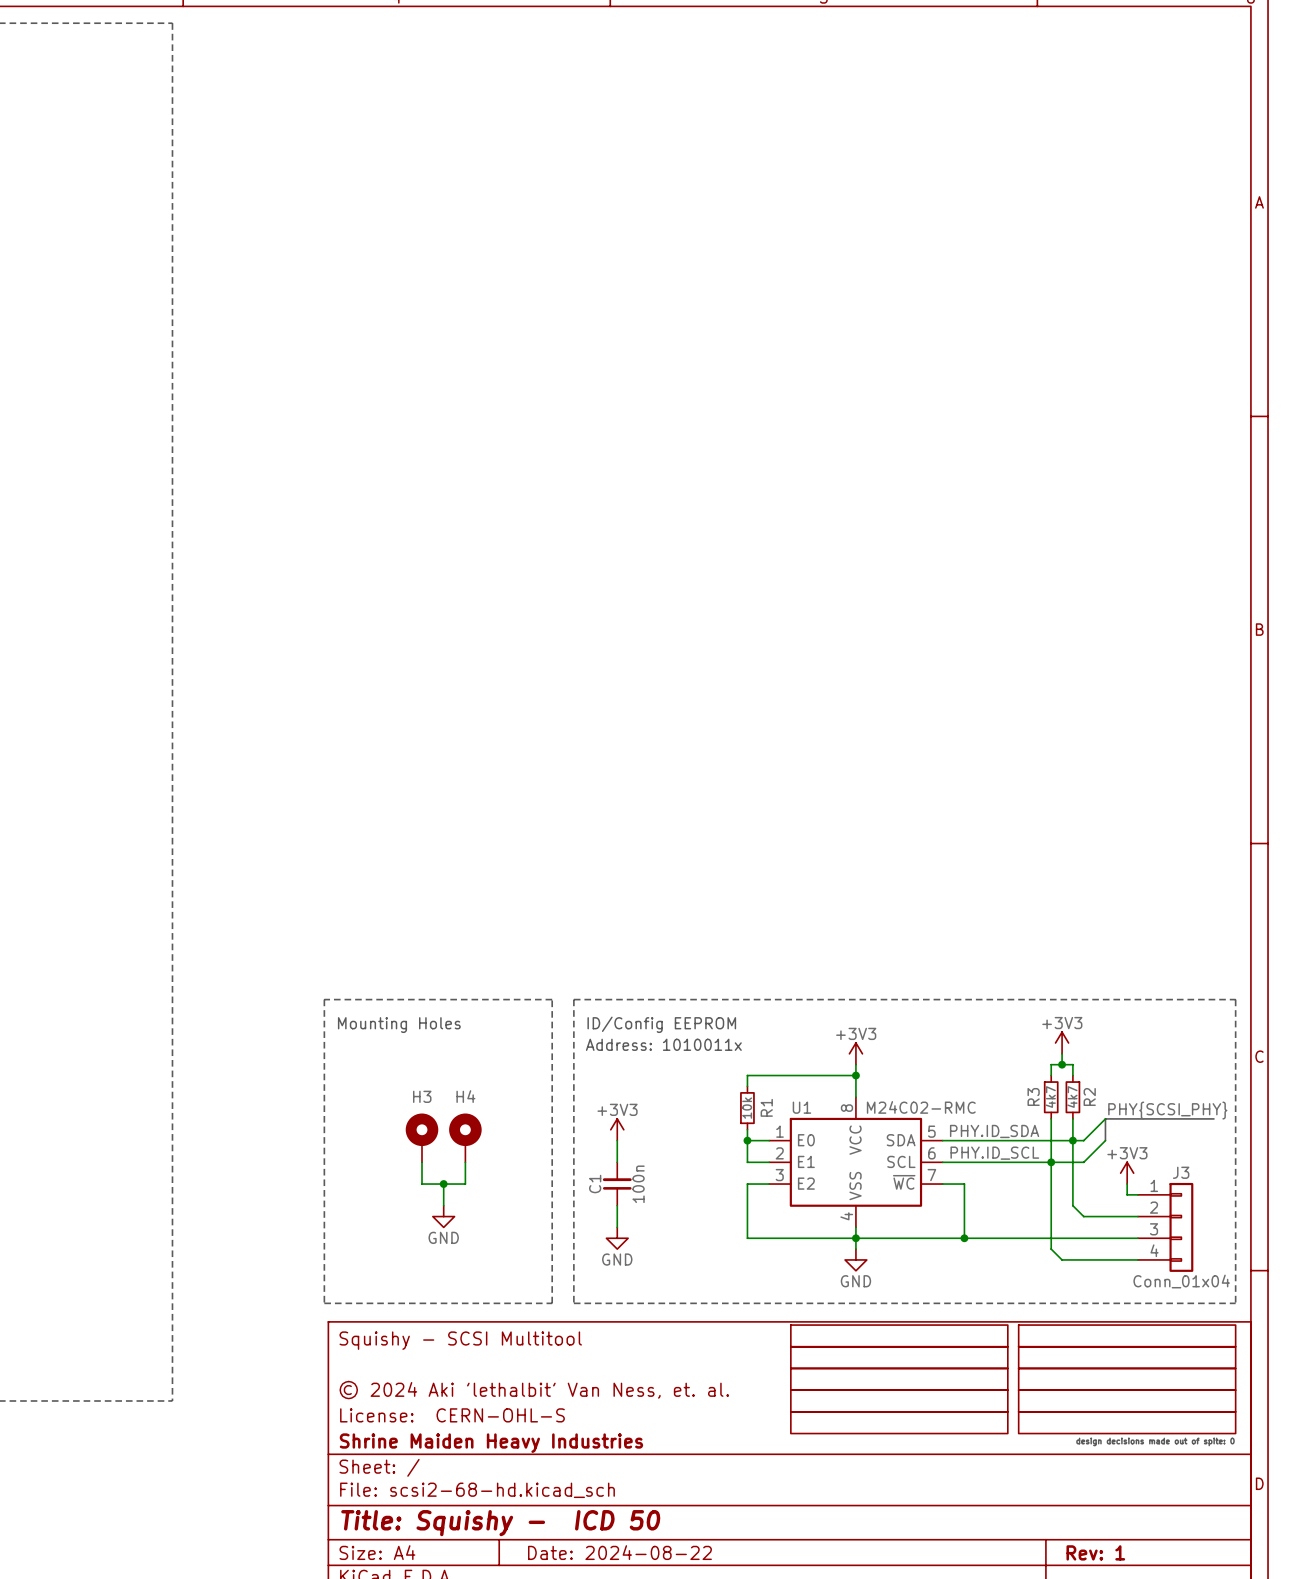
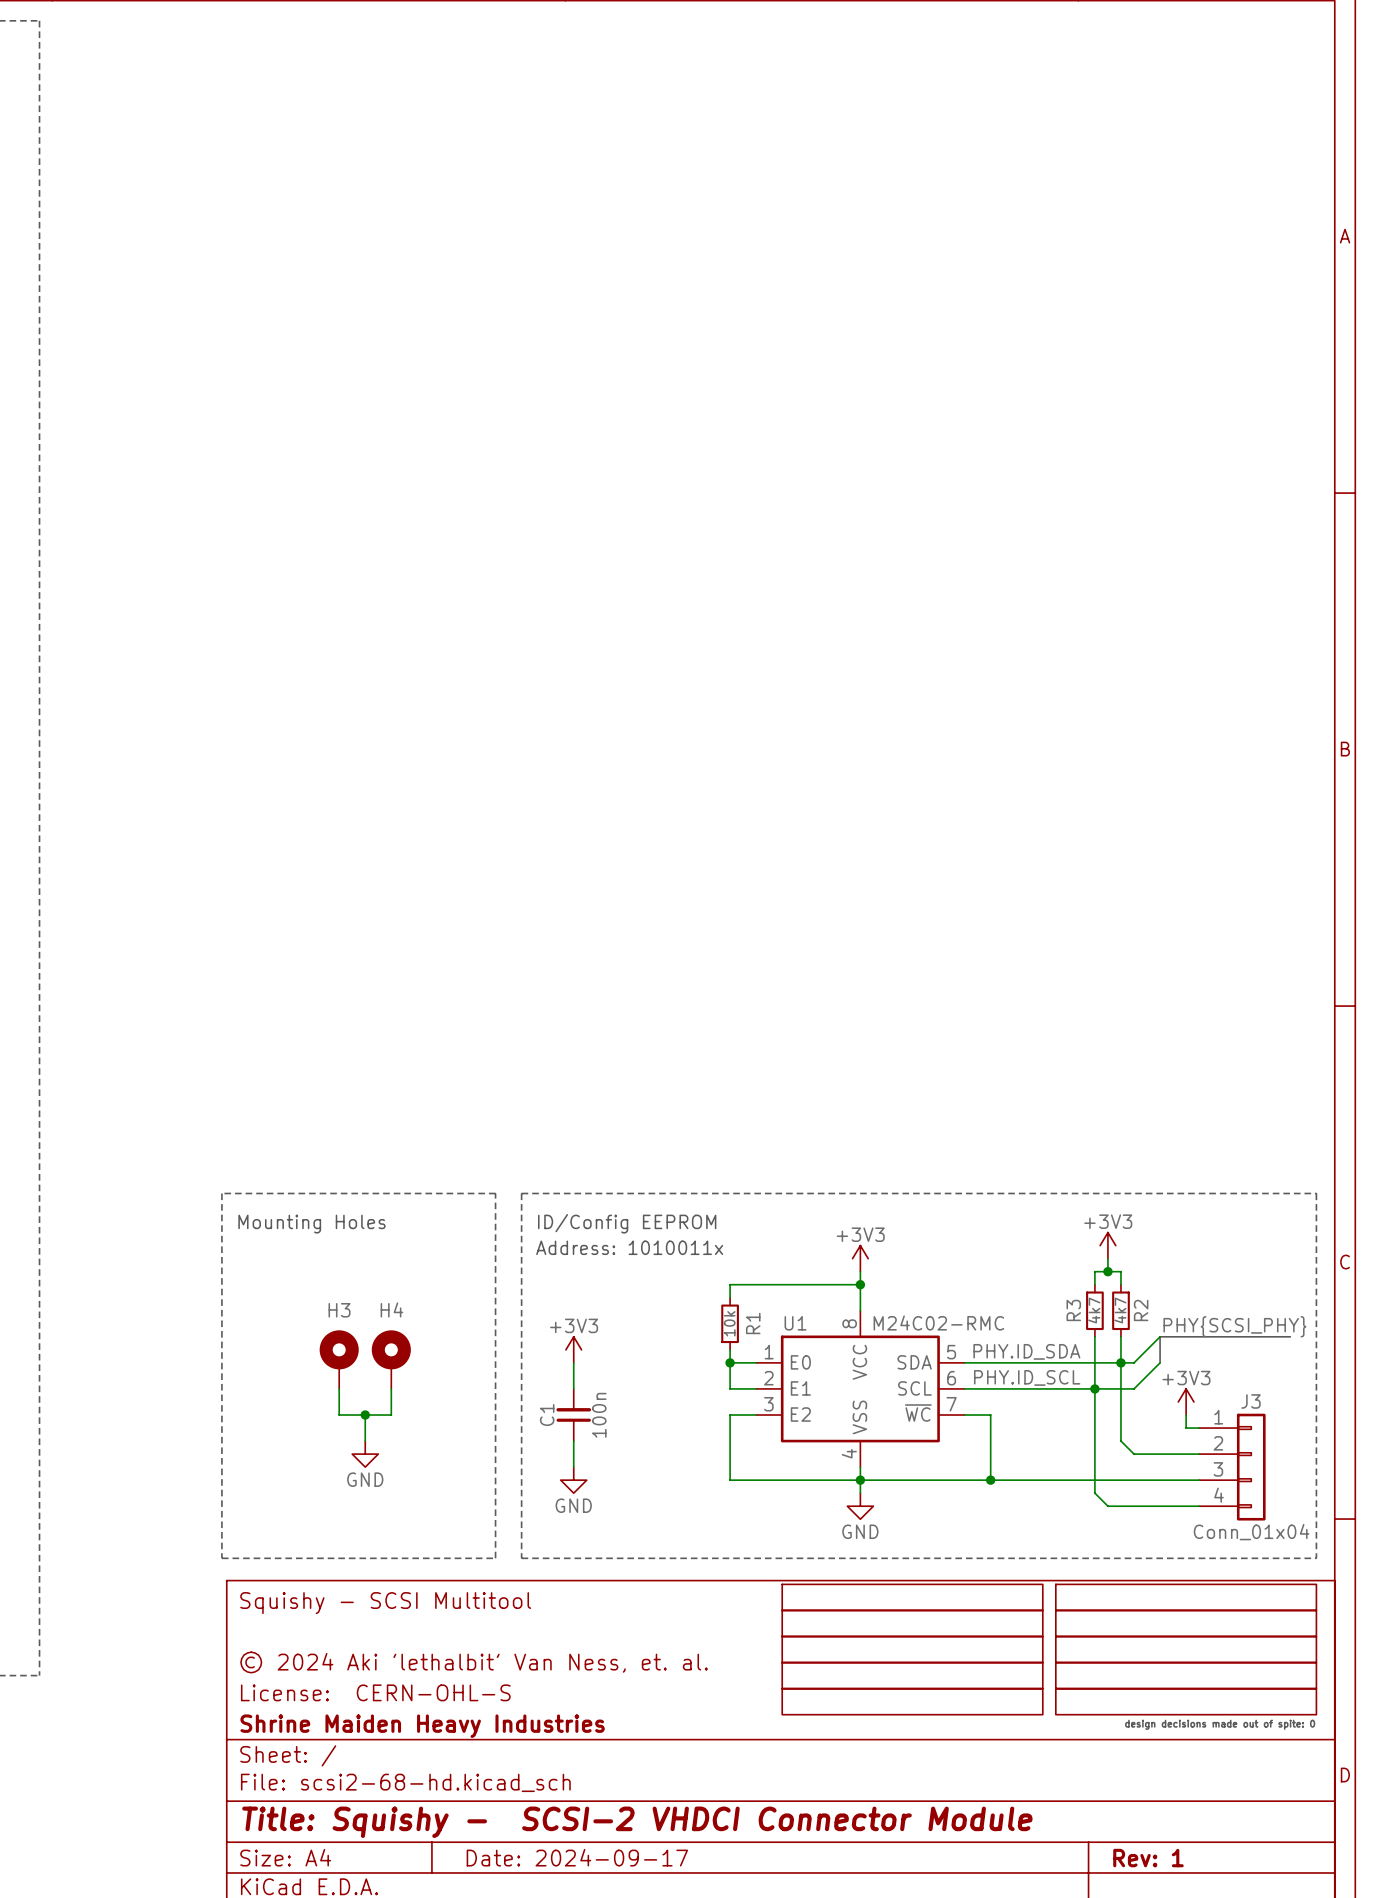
title block: Title: Squishy - ICD 50 (500, 1523) -> Title: Squishy - SCSI-2 VHDCI Connector Module (637, 1822)
title block: Date: 2024-08-22 (619, 1552) -> Date: 2024-09-17 (577, 1857)

